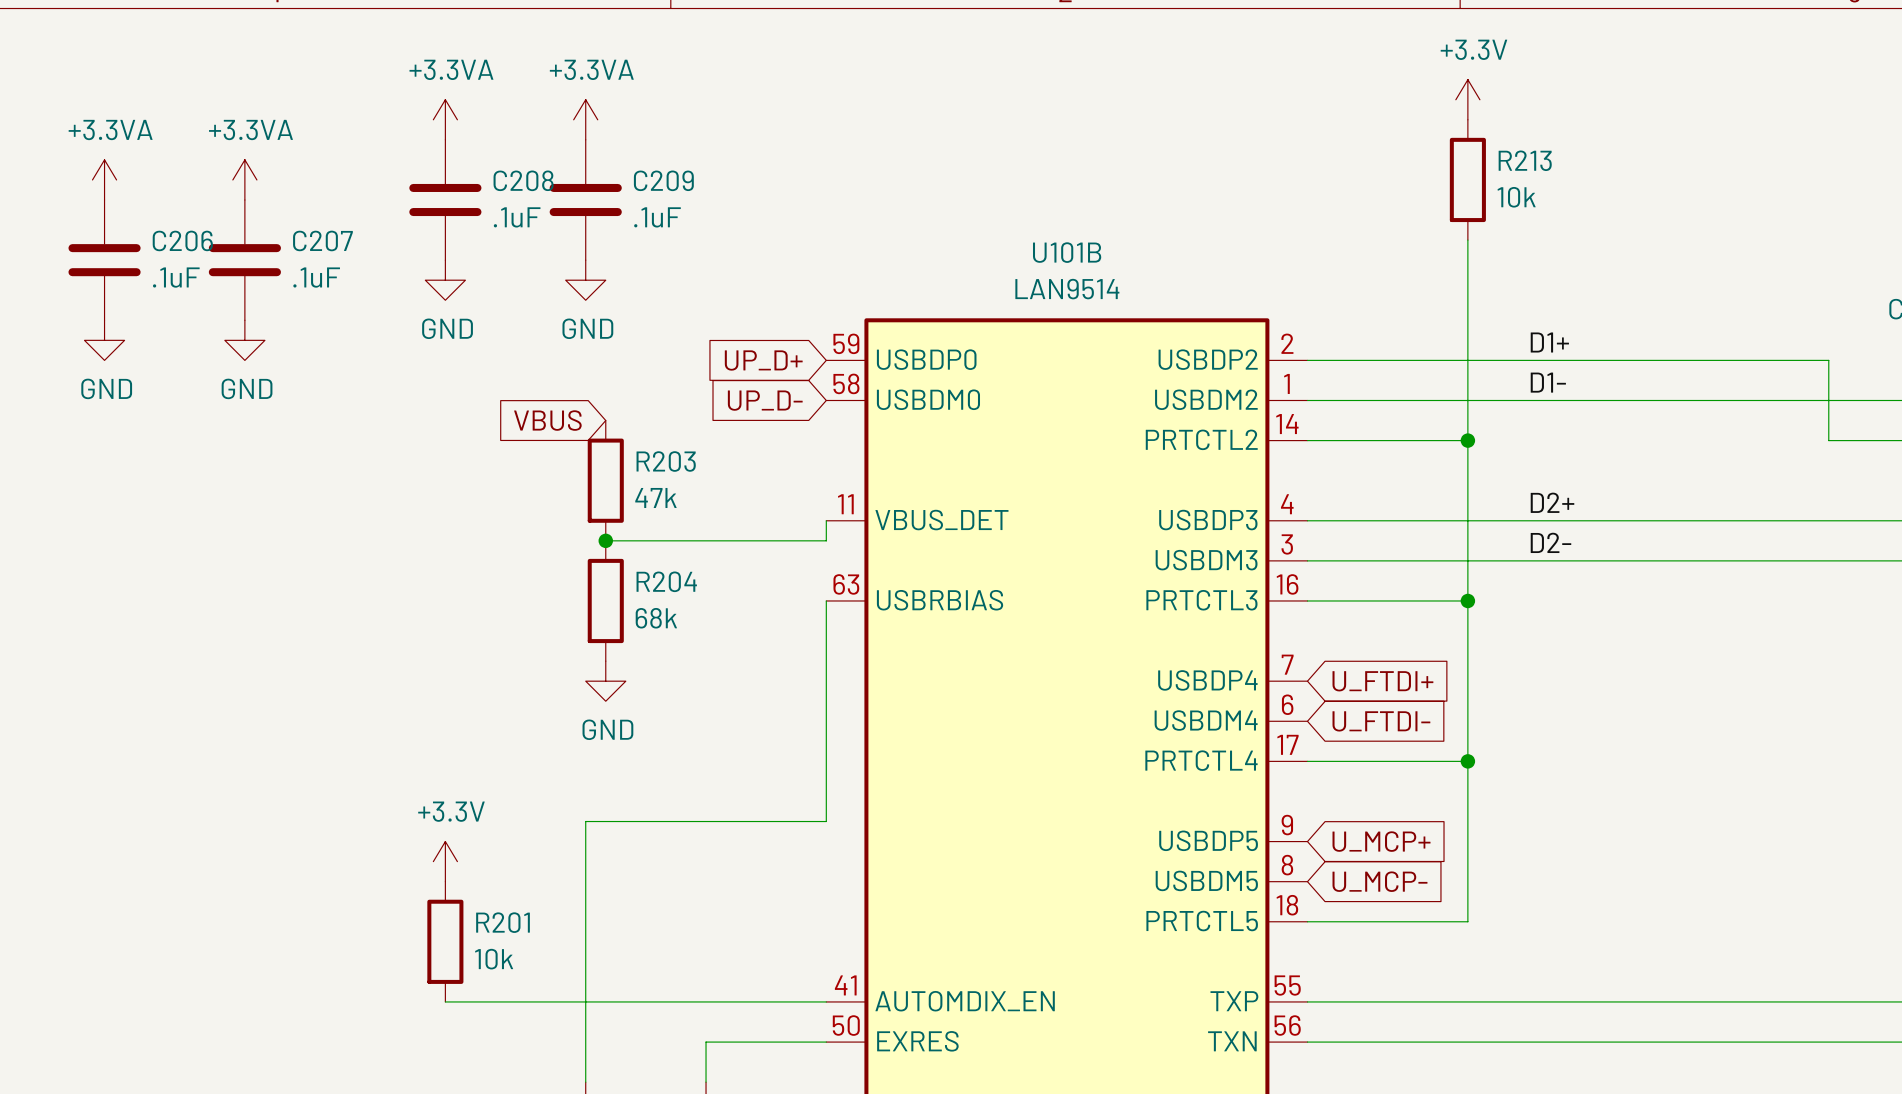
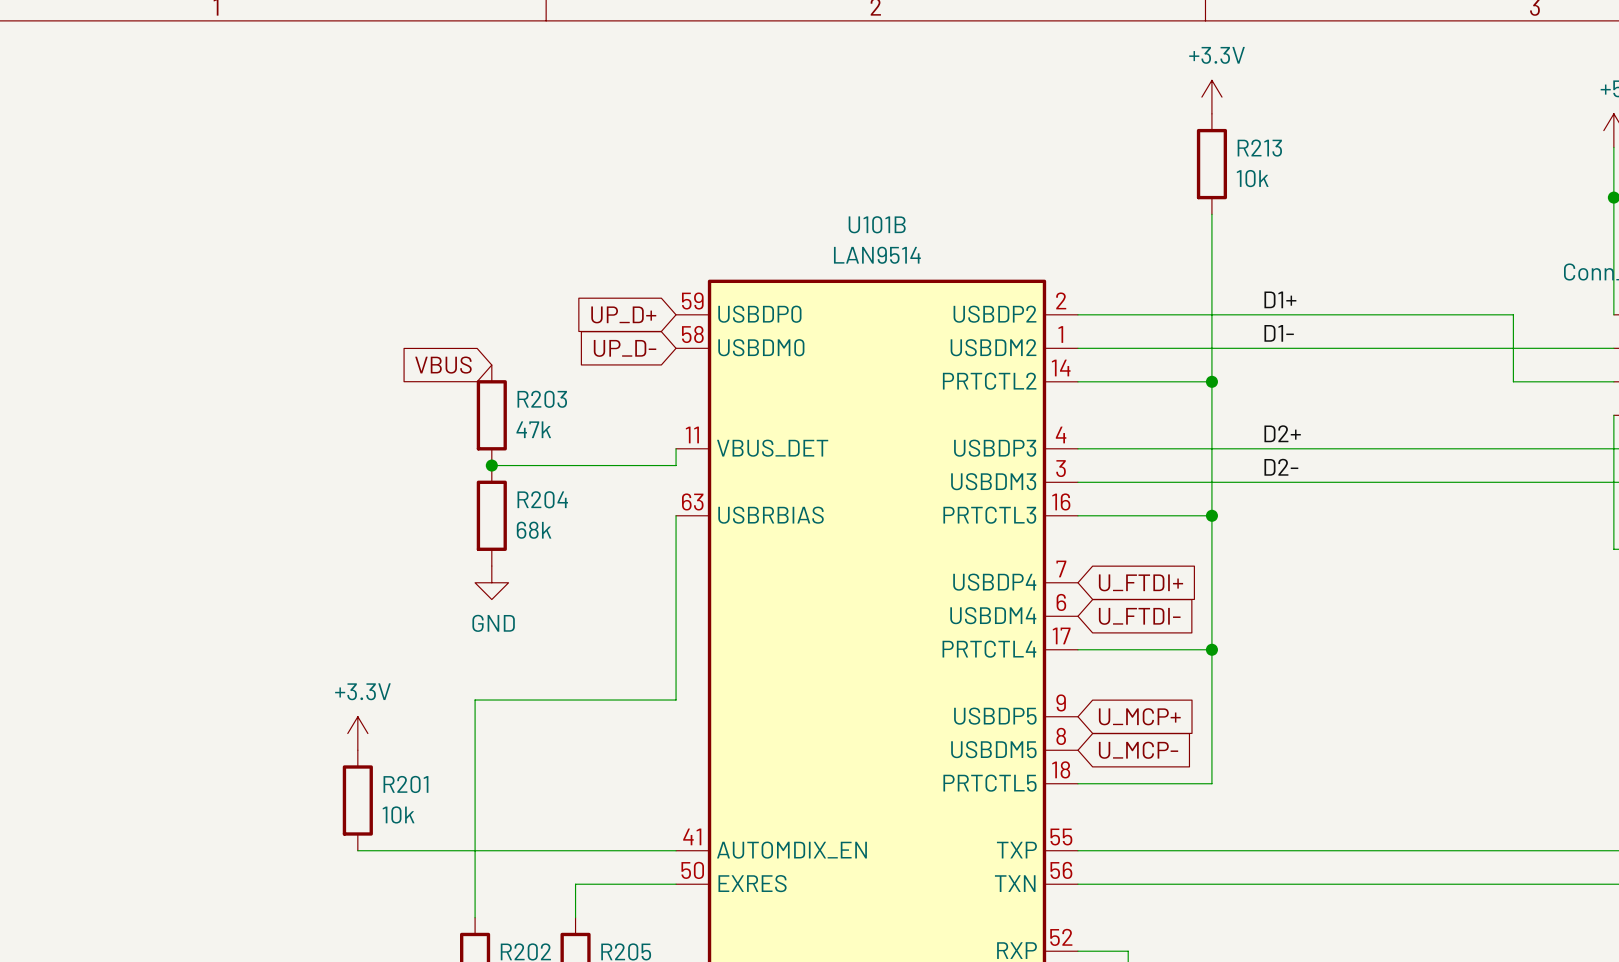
power symbol: +3.3VA (445, 119) -> none
power symbol: +3.3VA (585, 119) -> none
power symbol: +3.3VA (104, 179) -> none
power symbol: +3.3VA (244, 179) -> none
C208: .1uF (445, 200) -> none
C209: .1uF (585, 200) -> none
C206: .1uF (104, 260) -> none
C207: .1uF (244, 260) -> none
power symbol: GND (445, 280) -> none
power symbol: GND (585, 280) -> none
power symbol: GND (104, 340) -> none
power symbol: GND (244, 340) -> none

